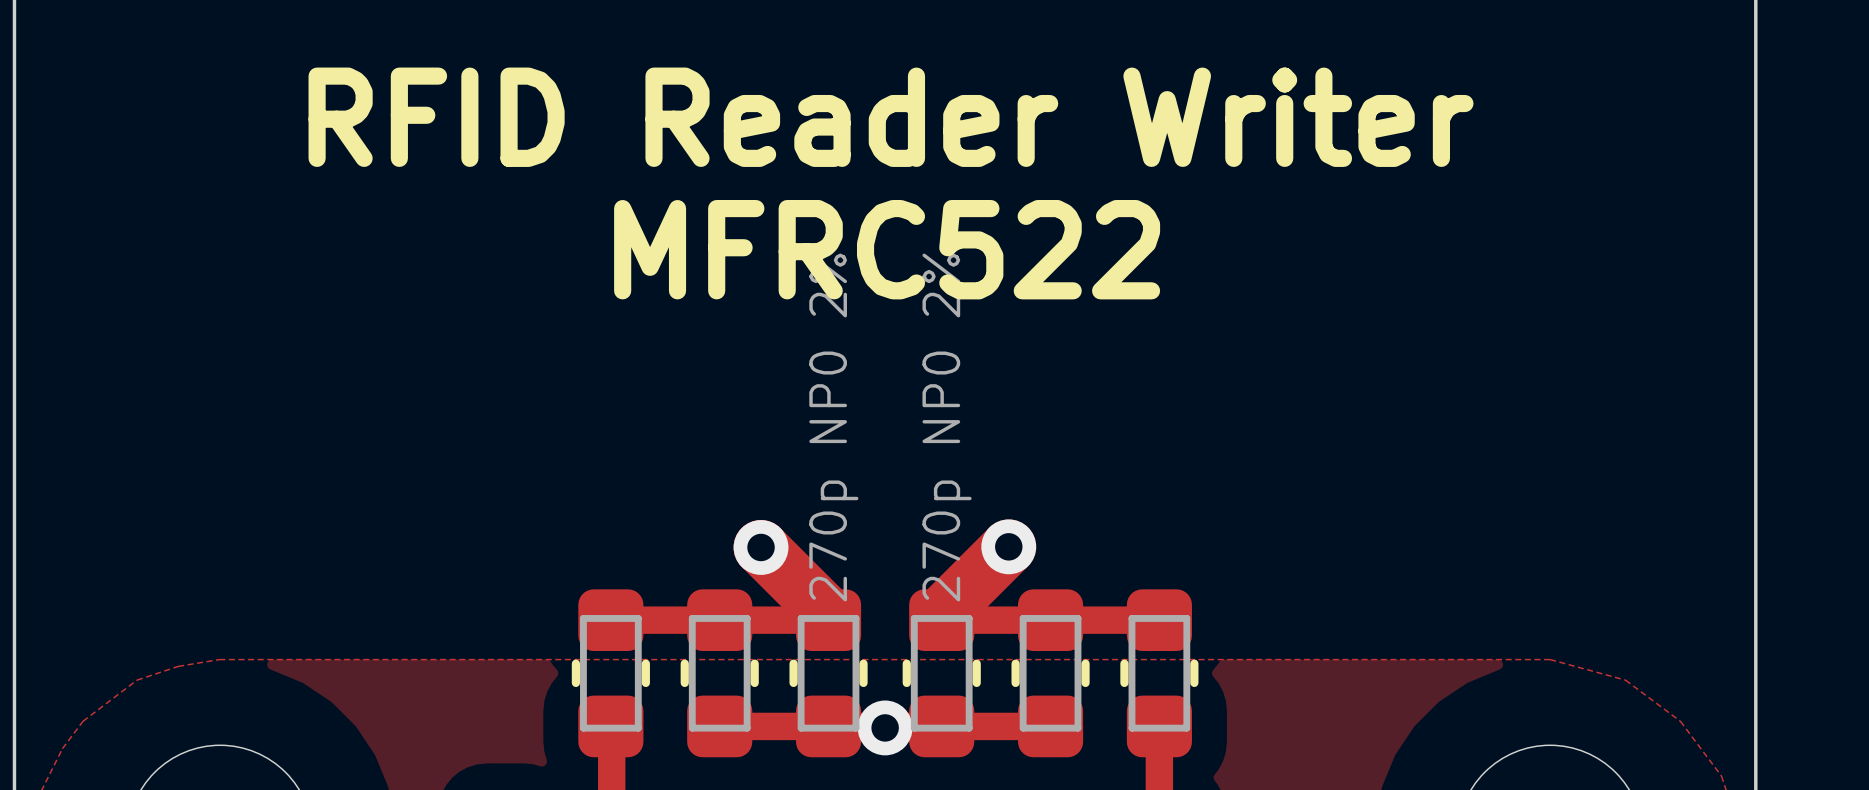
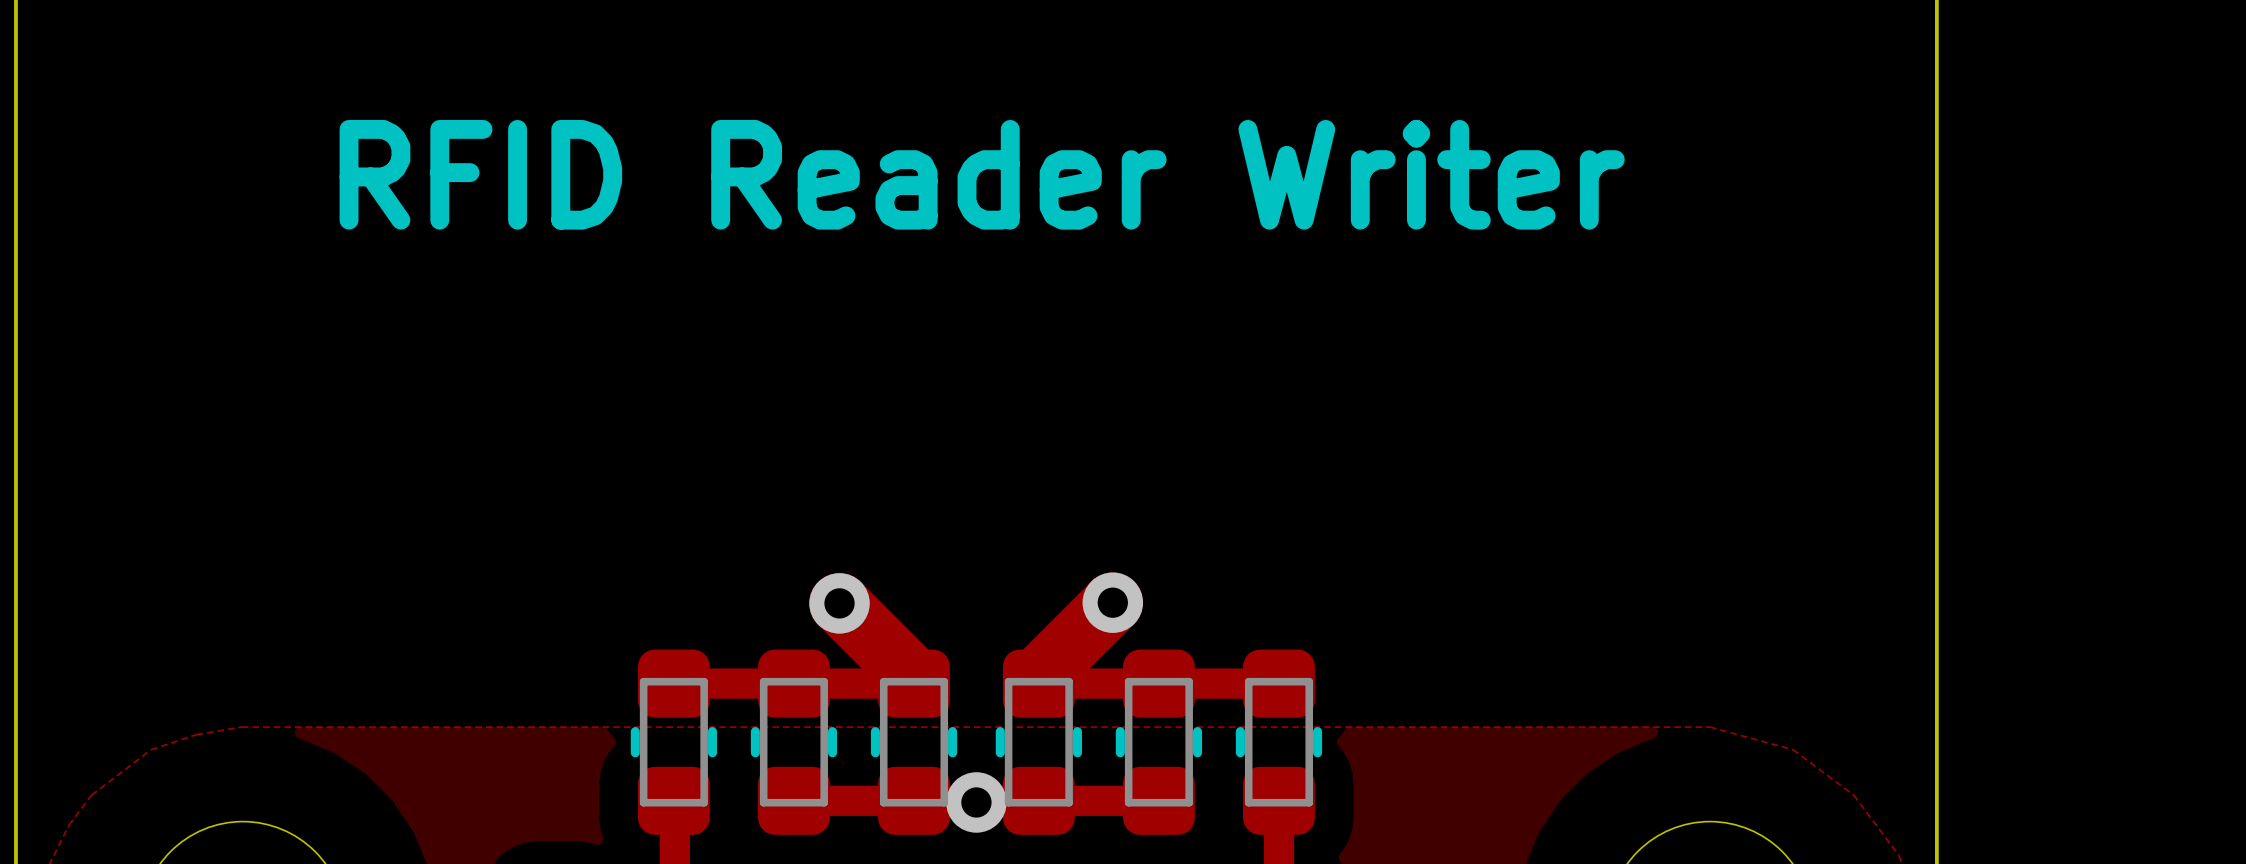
text position: RFID Reader Writer (891, 117) -> RFID Reader Writer (982, 174)
text: MFRC522 (887, 249) -> none
part value: 270p NP0 2% (833, 427) -> none
part value: 270p NP0 2% (947, 427) -> none

